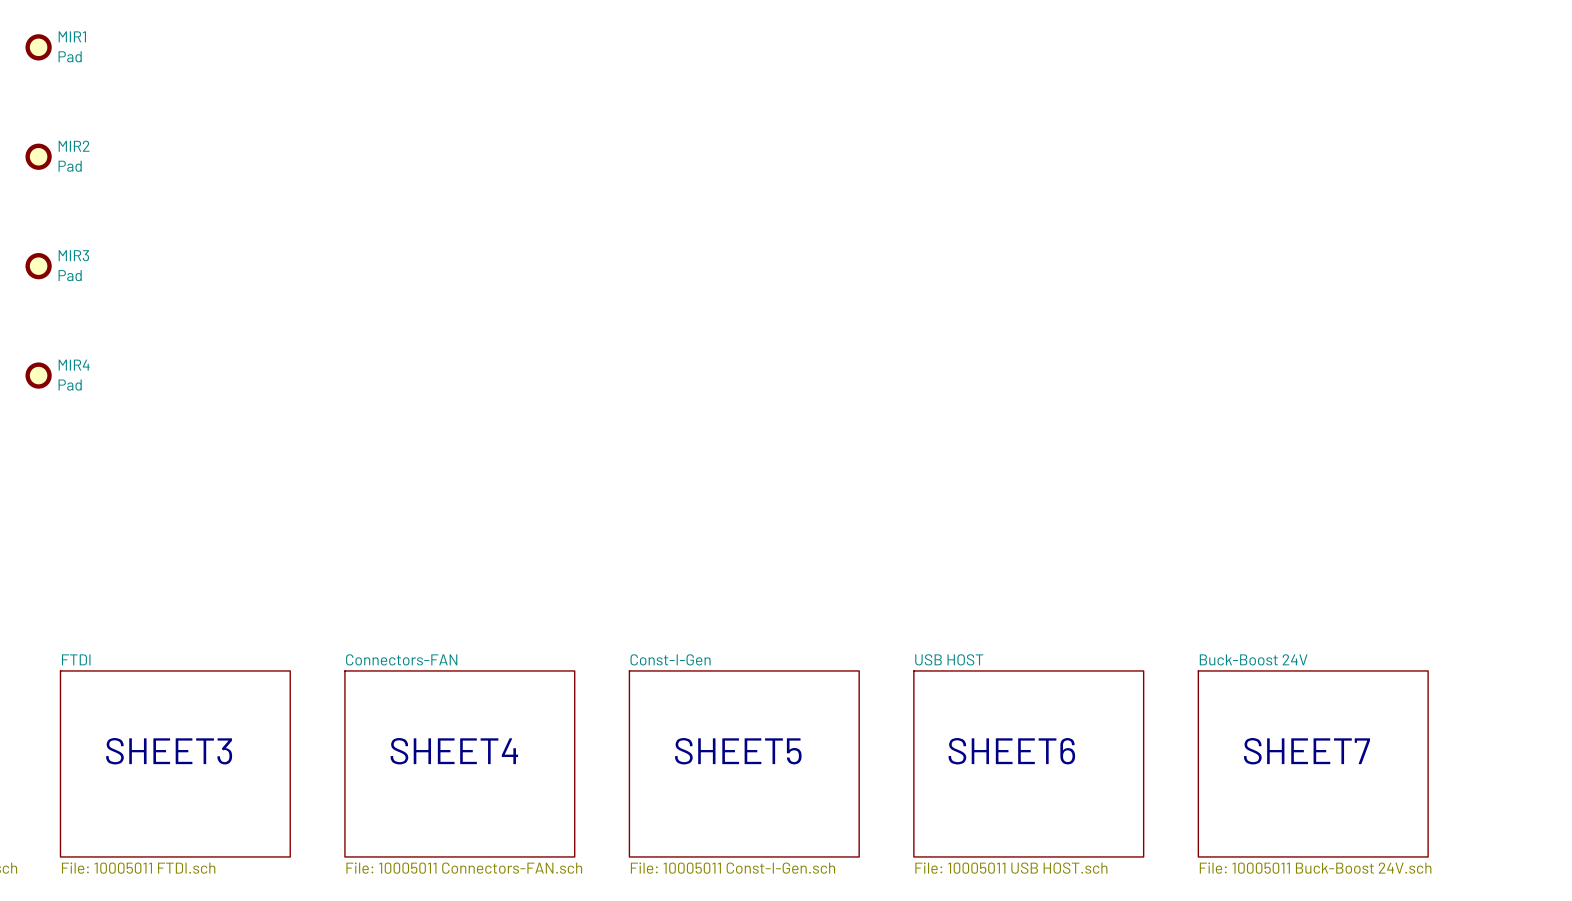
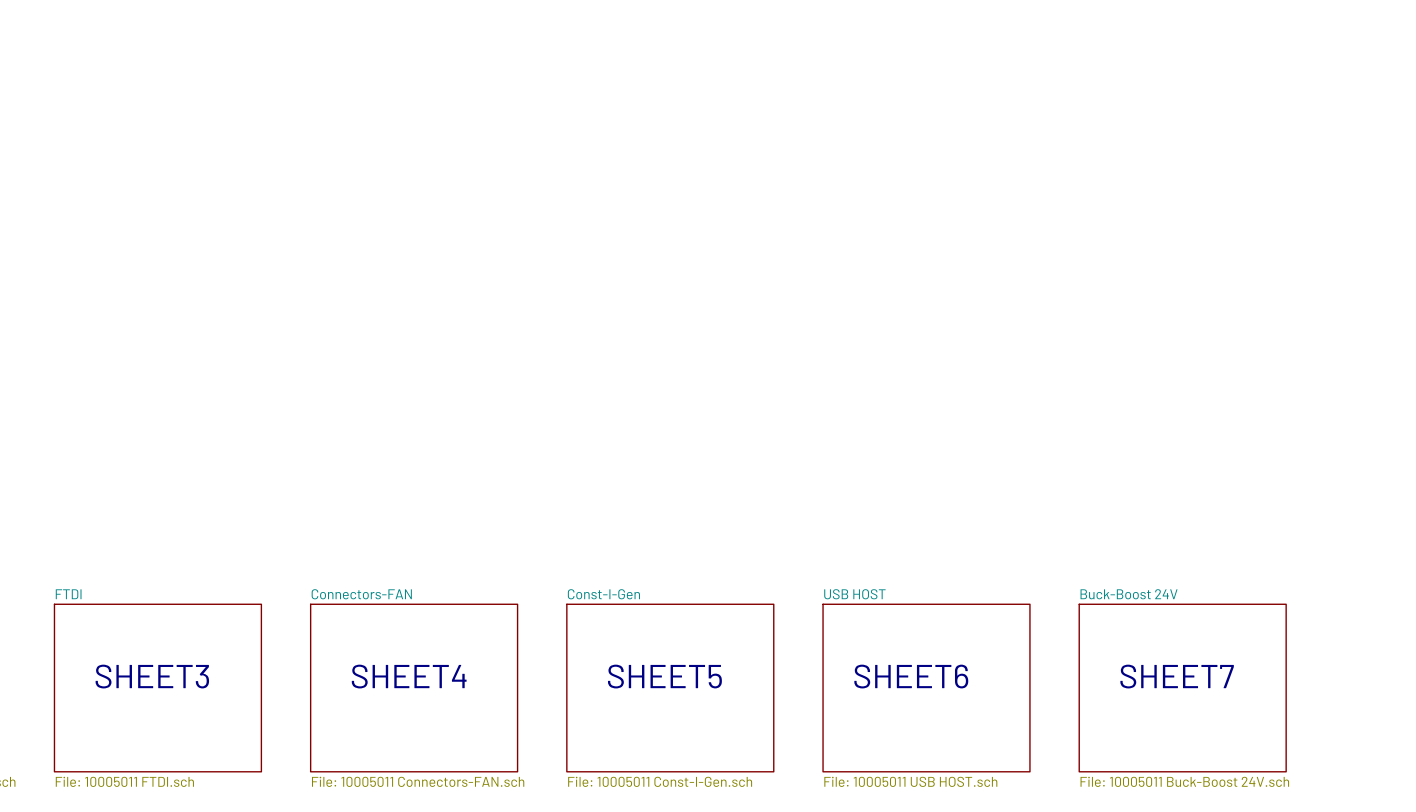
MIR1: Pad (38, 47) -> none
MIR2: Pad (38, 156) -> none
MIR3: Pad (38, 266) -> none
MIR4: Pad (38, 375) -> none

